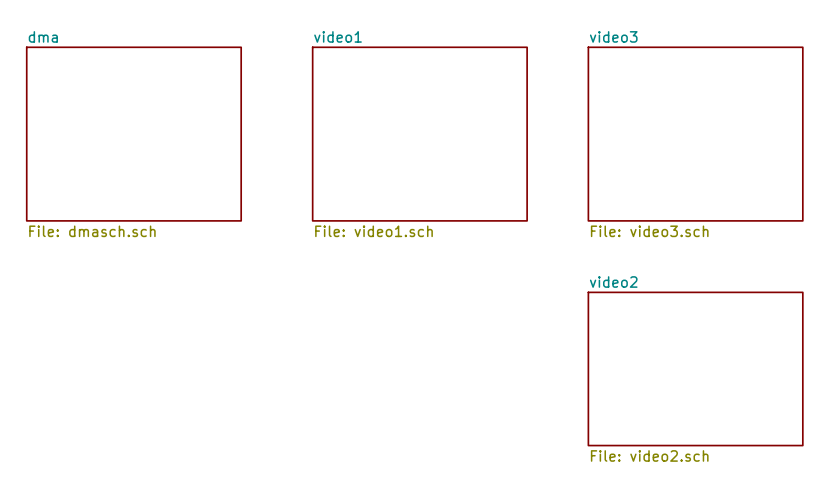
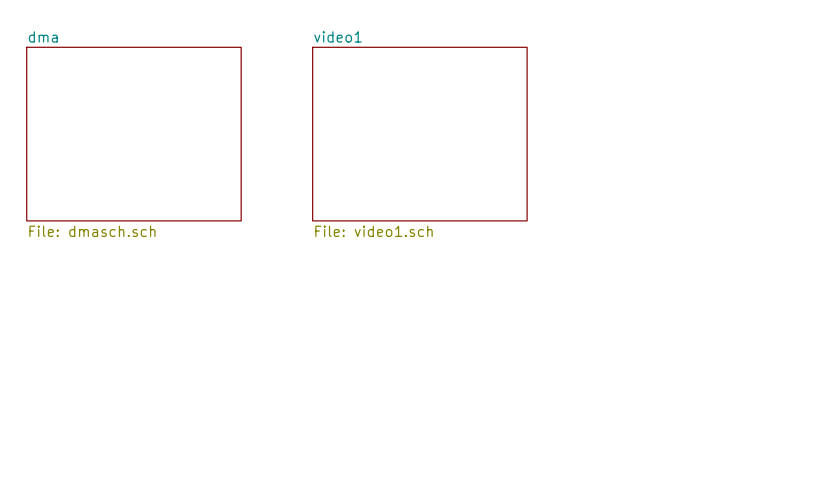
sheet video3: File: video3.sch (695, 134) -> none
sheet video2: File: video2.sch (695, 368) -> none

